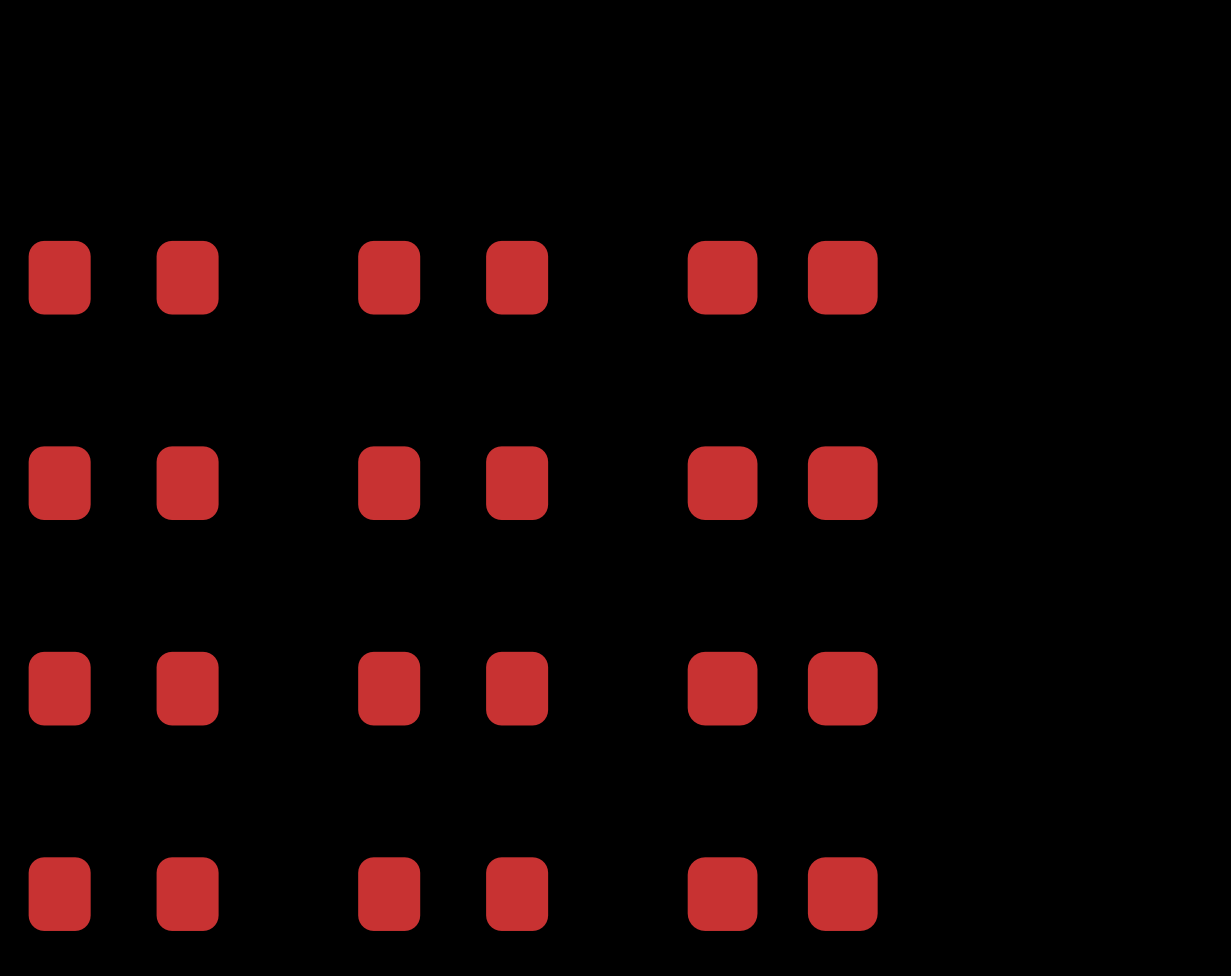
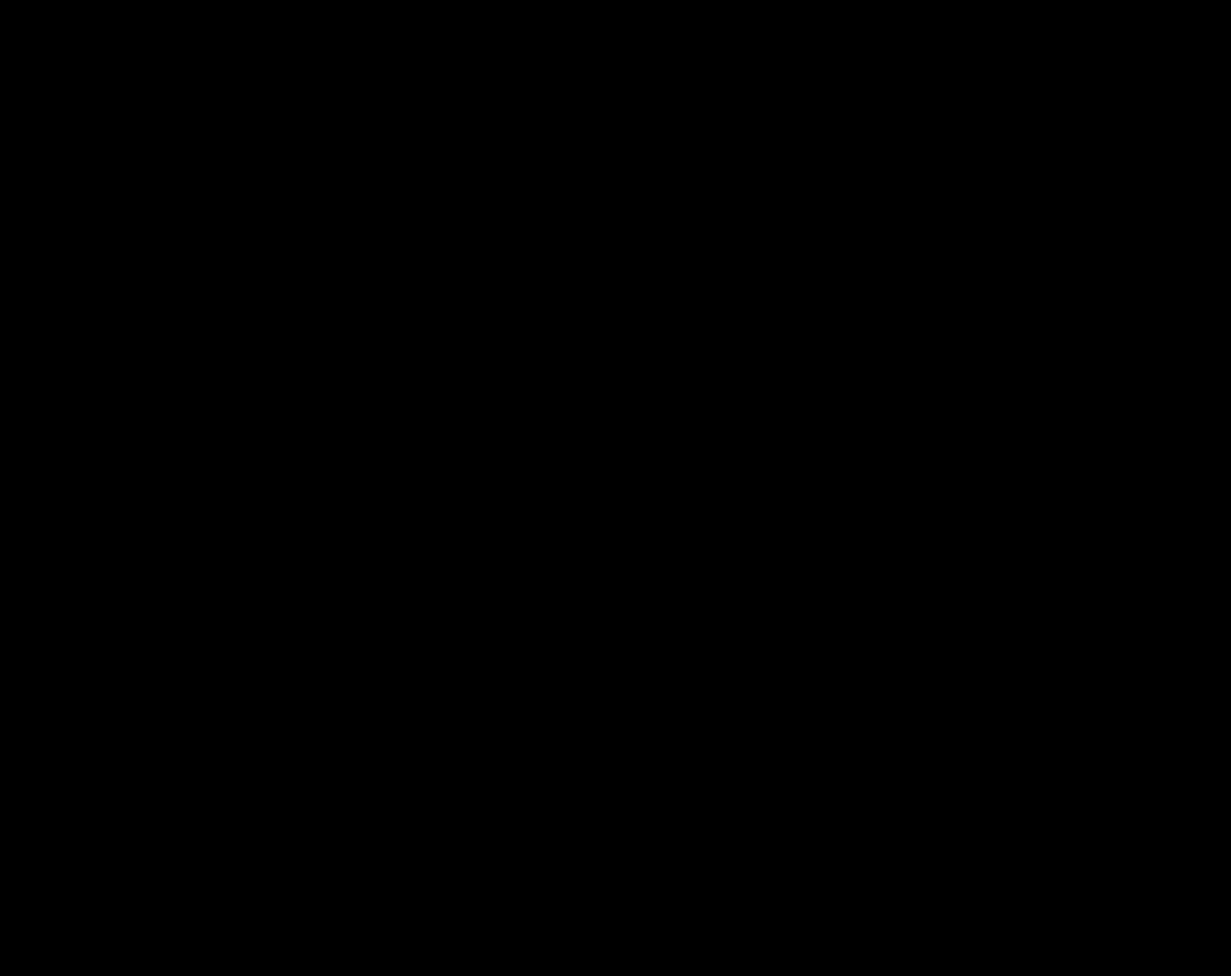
part: (123, 277) -> none
part: (453, 277) -> none
part: (782, 277) -> none
part: (123, 483) -> none
part: (453, 483) -> none
part: (782, 483) -> none
part: (123, 688) -> none
part: (453, 688) -> none
part: (782, 688) -> none
part: (123, 894) -> none
part: (453, 894) -> none
part: (782, 894) -> none

